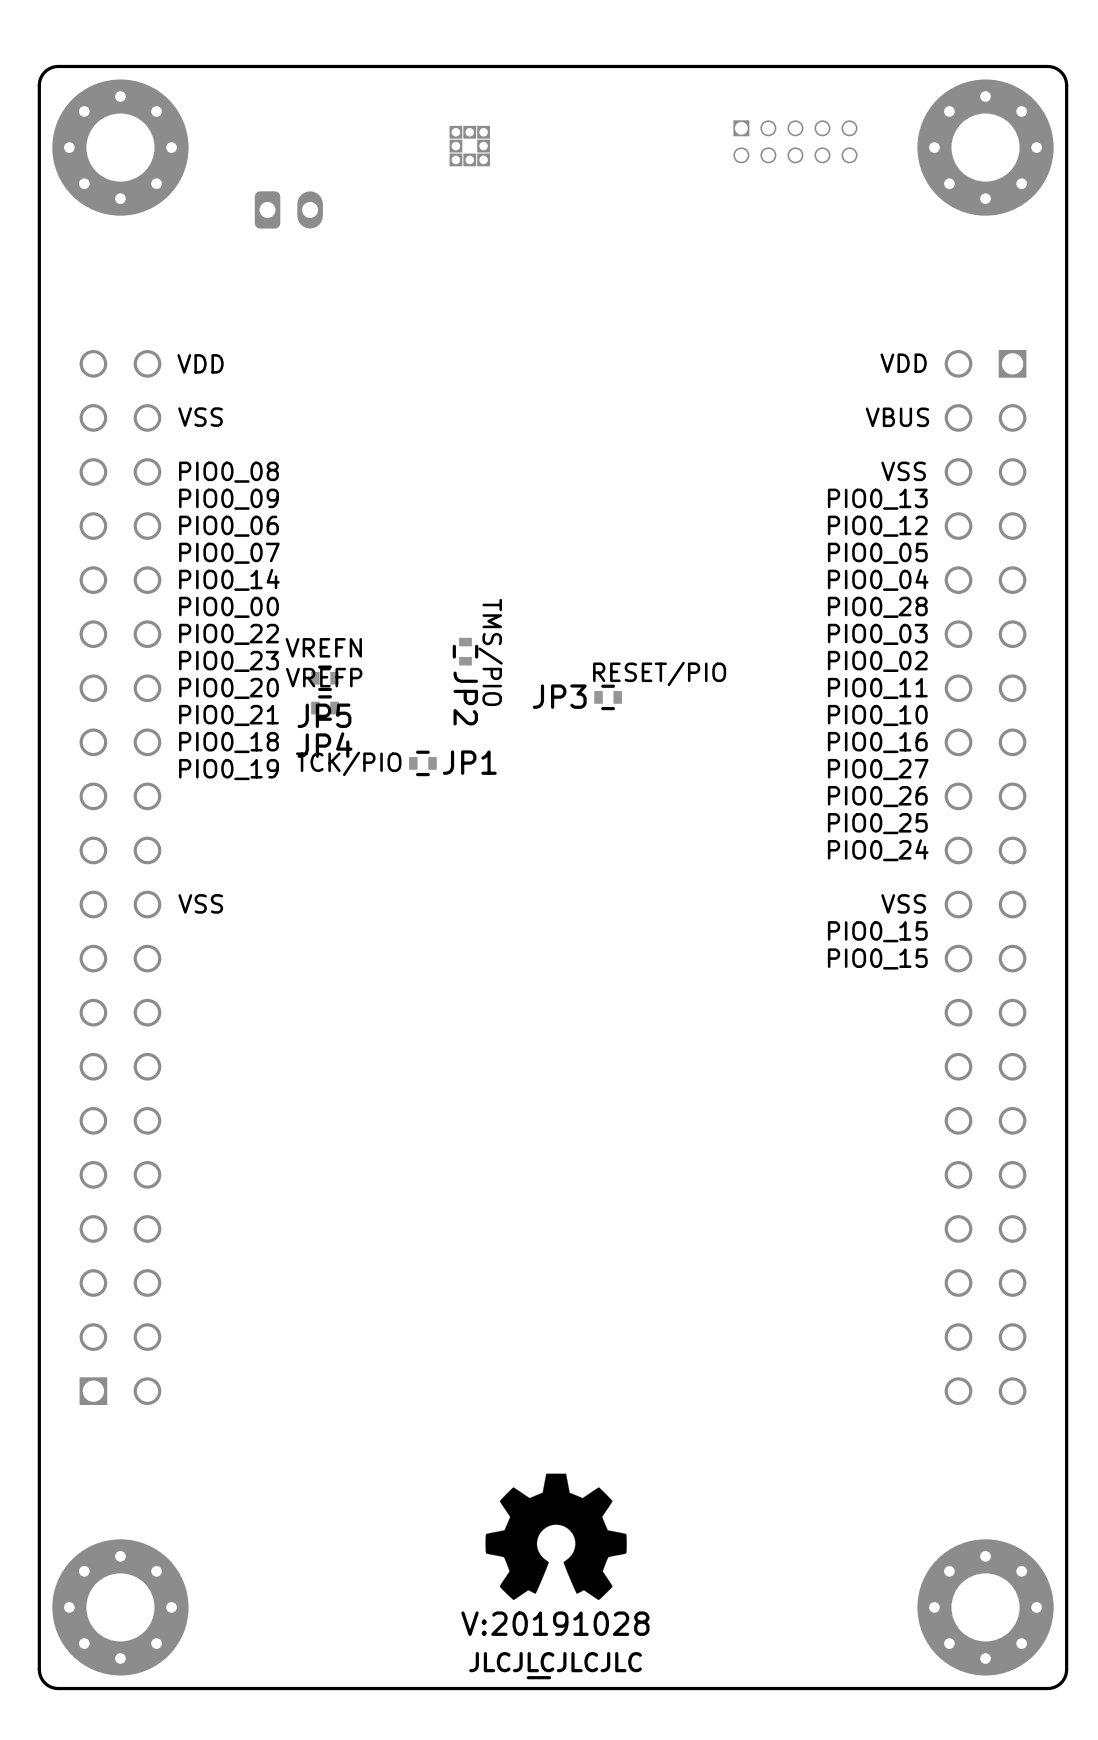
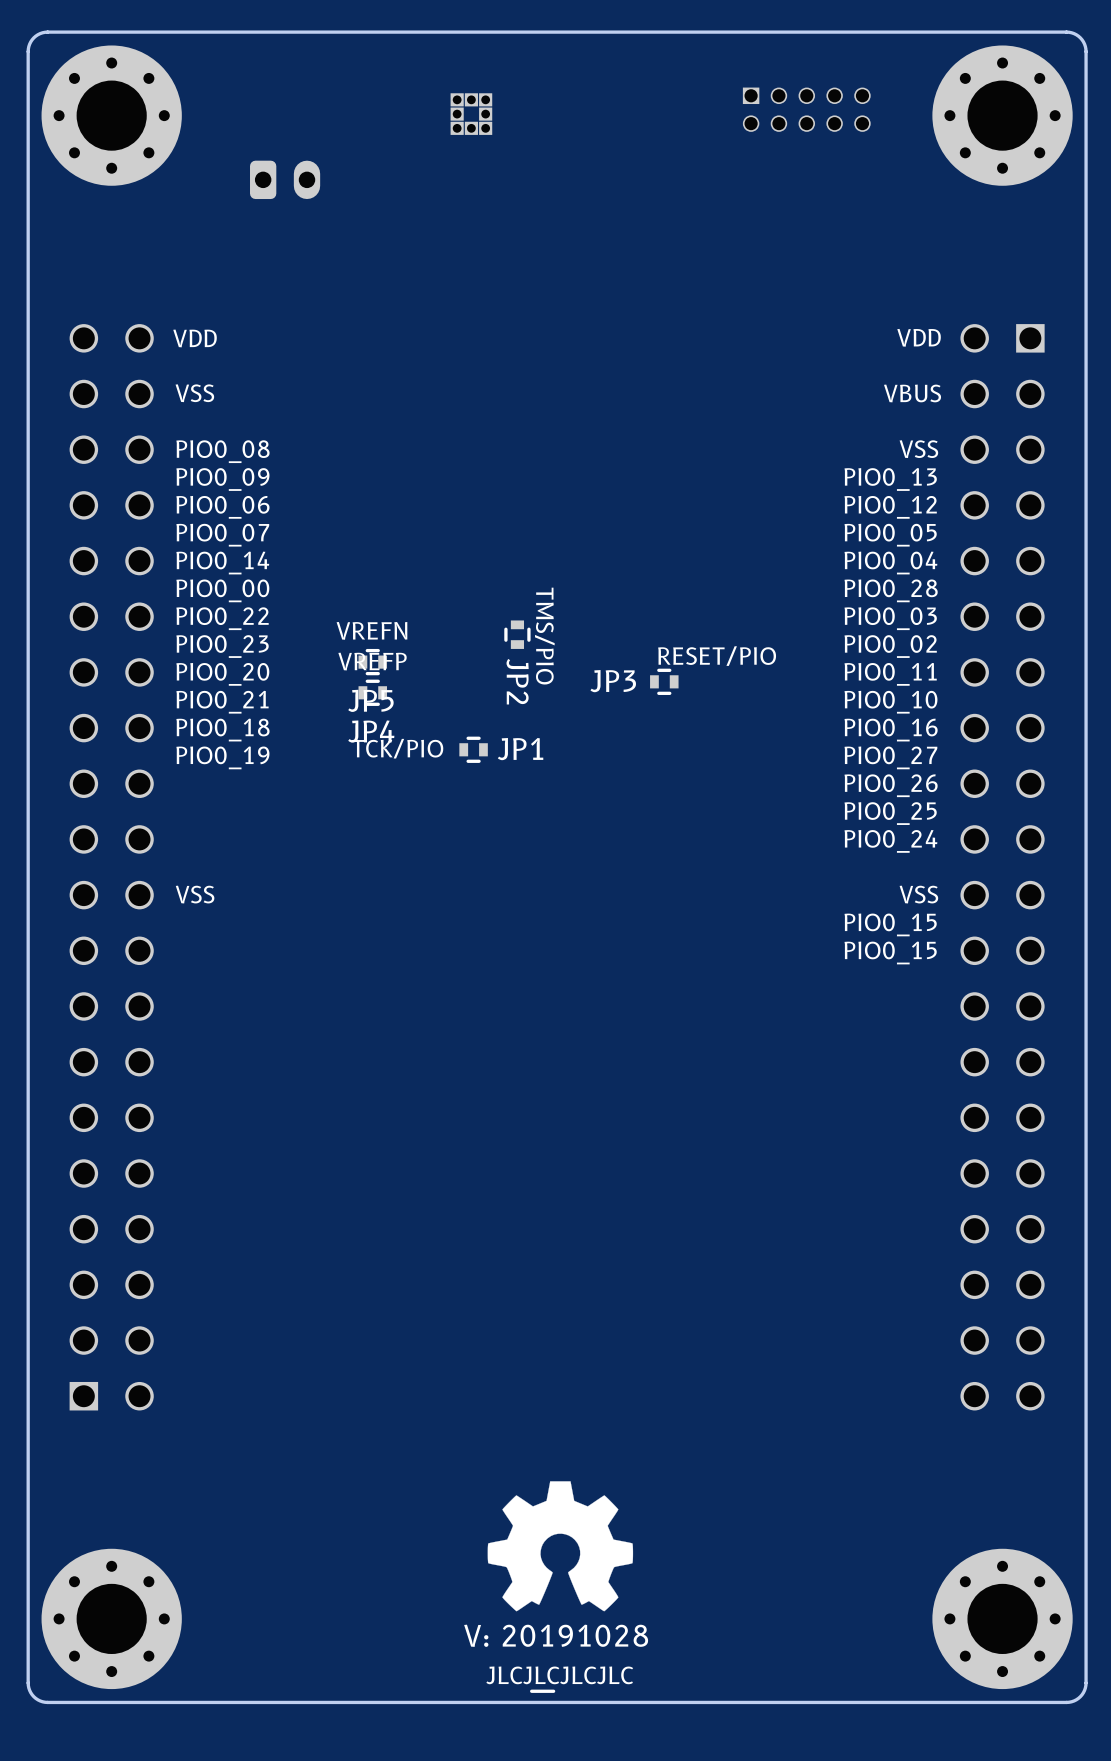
JP2 position: (465, 651) -> (517, 634)
JP5 position: (325, 678) -> (372, 662)
JP3 position: (608, 697) -> (664, 681)
JP4 position: (325, 708) -> (372, 692)
JP1 position: (422, 763) -> (473, 749)

